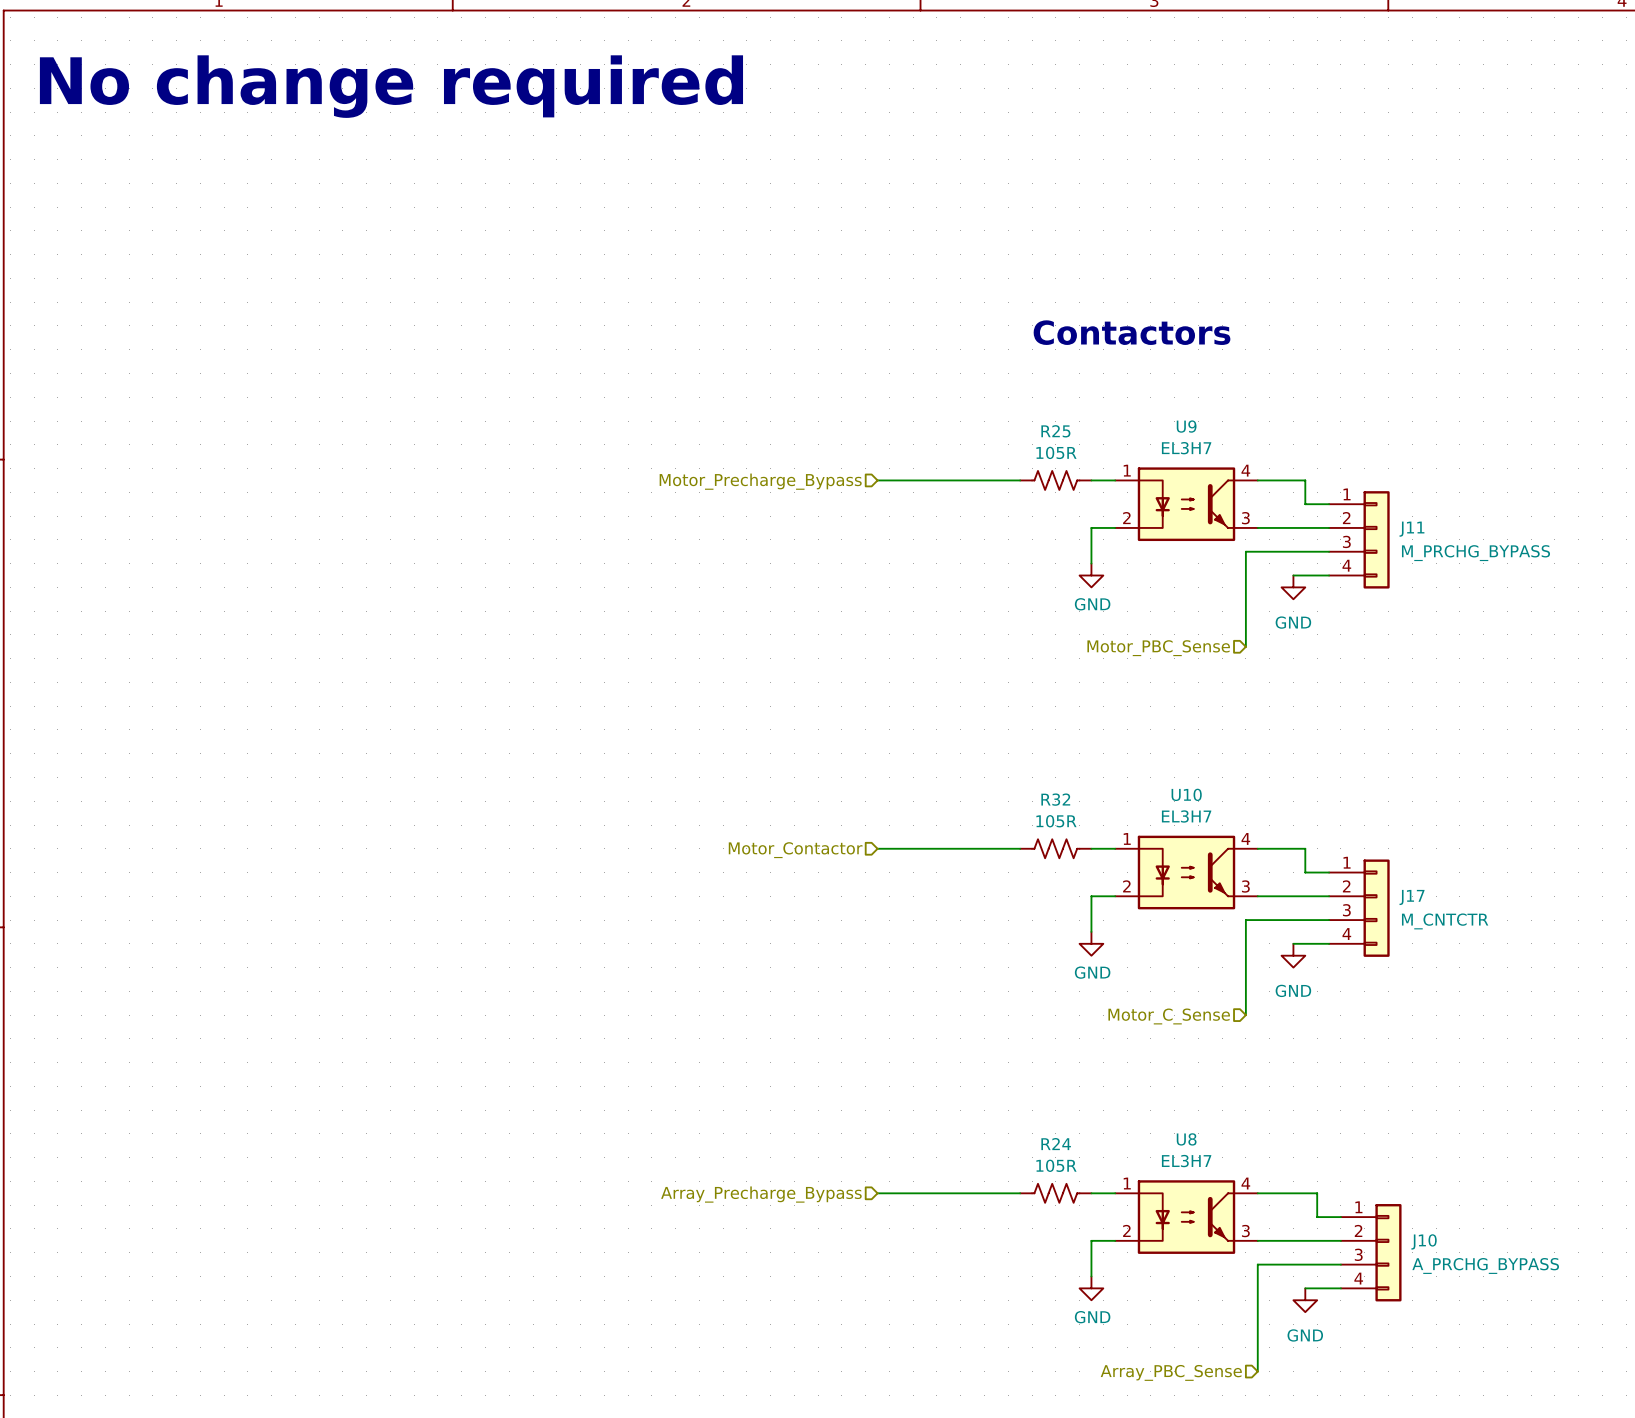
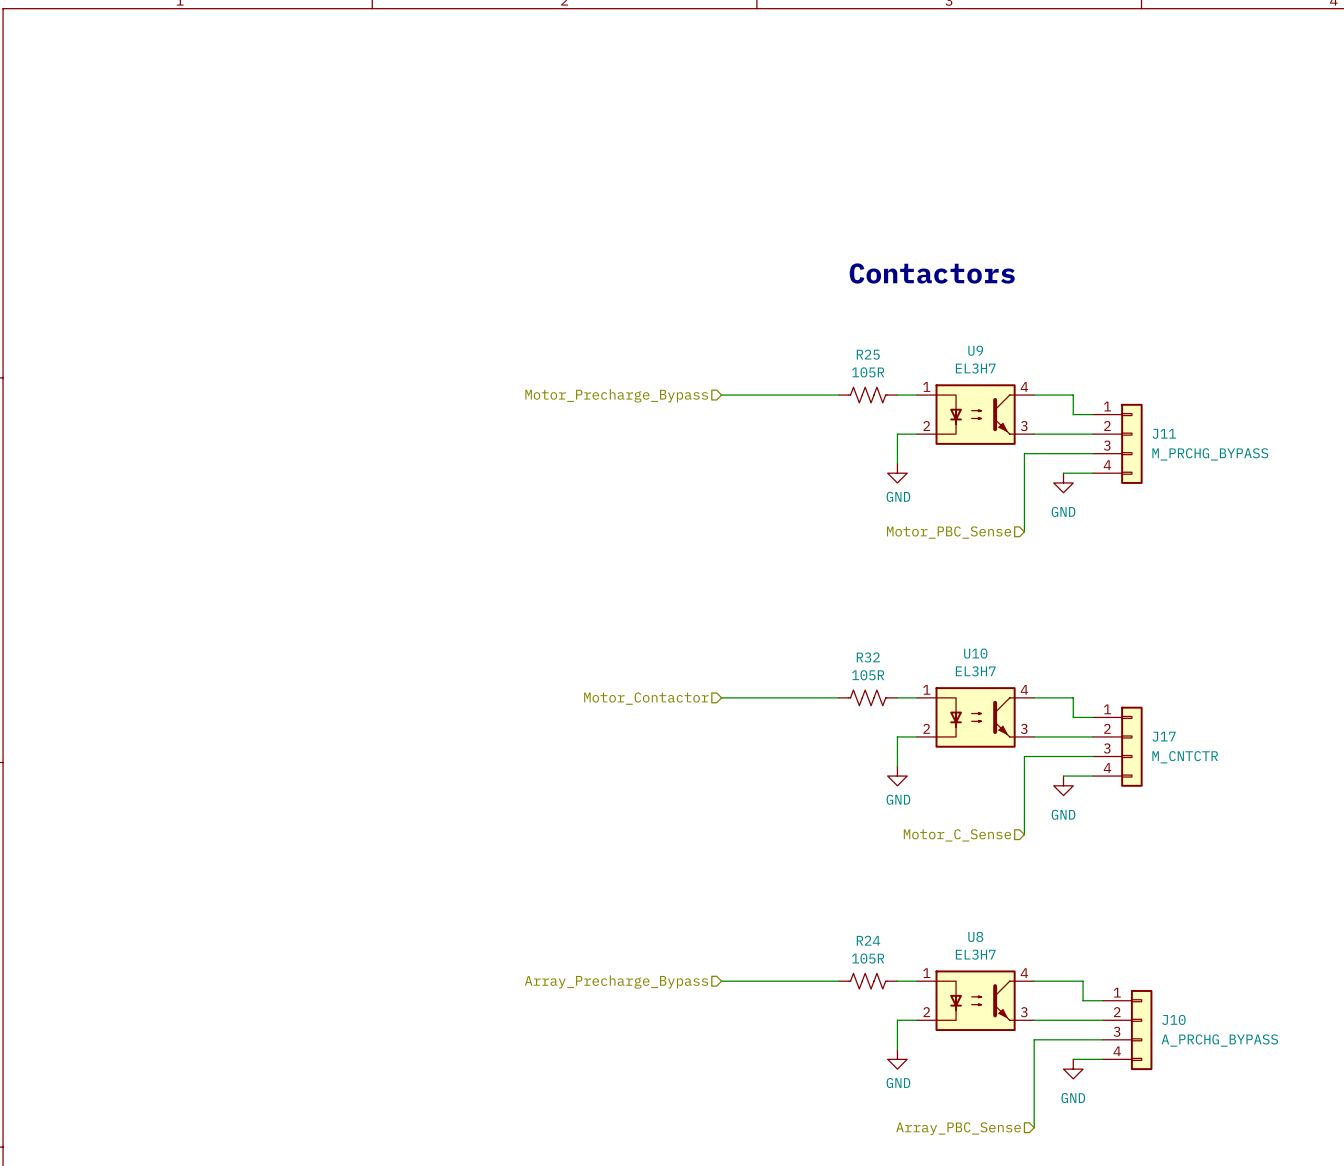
text: No change required (391, 86) -> none

